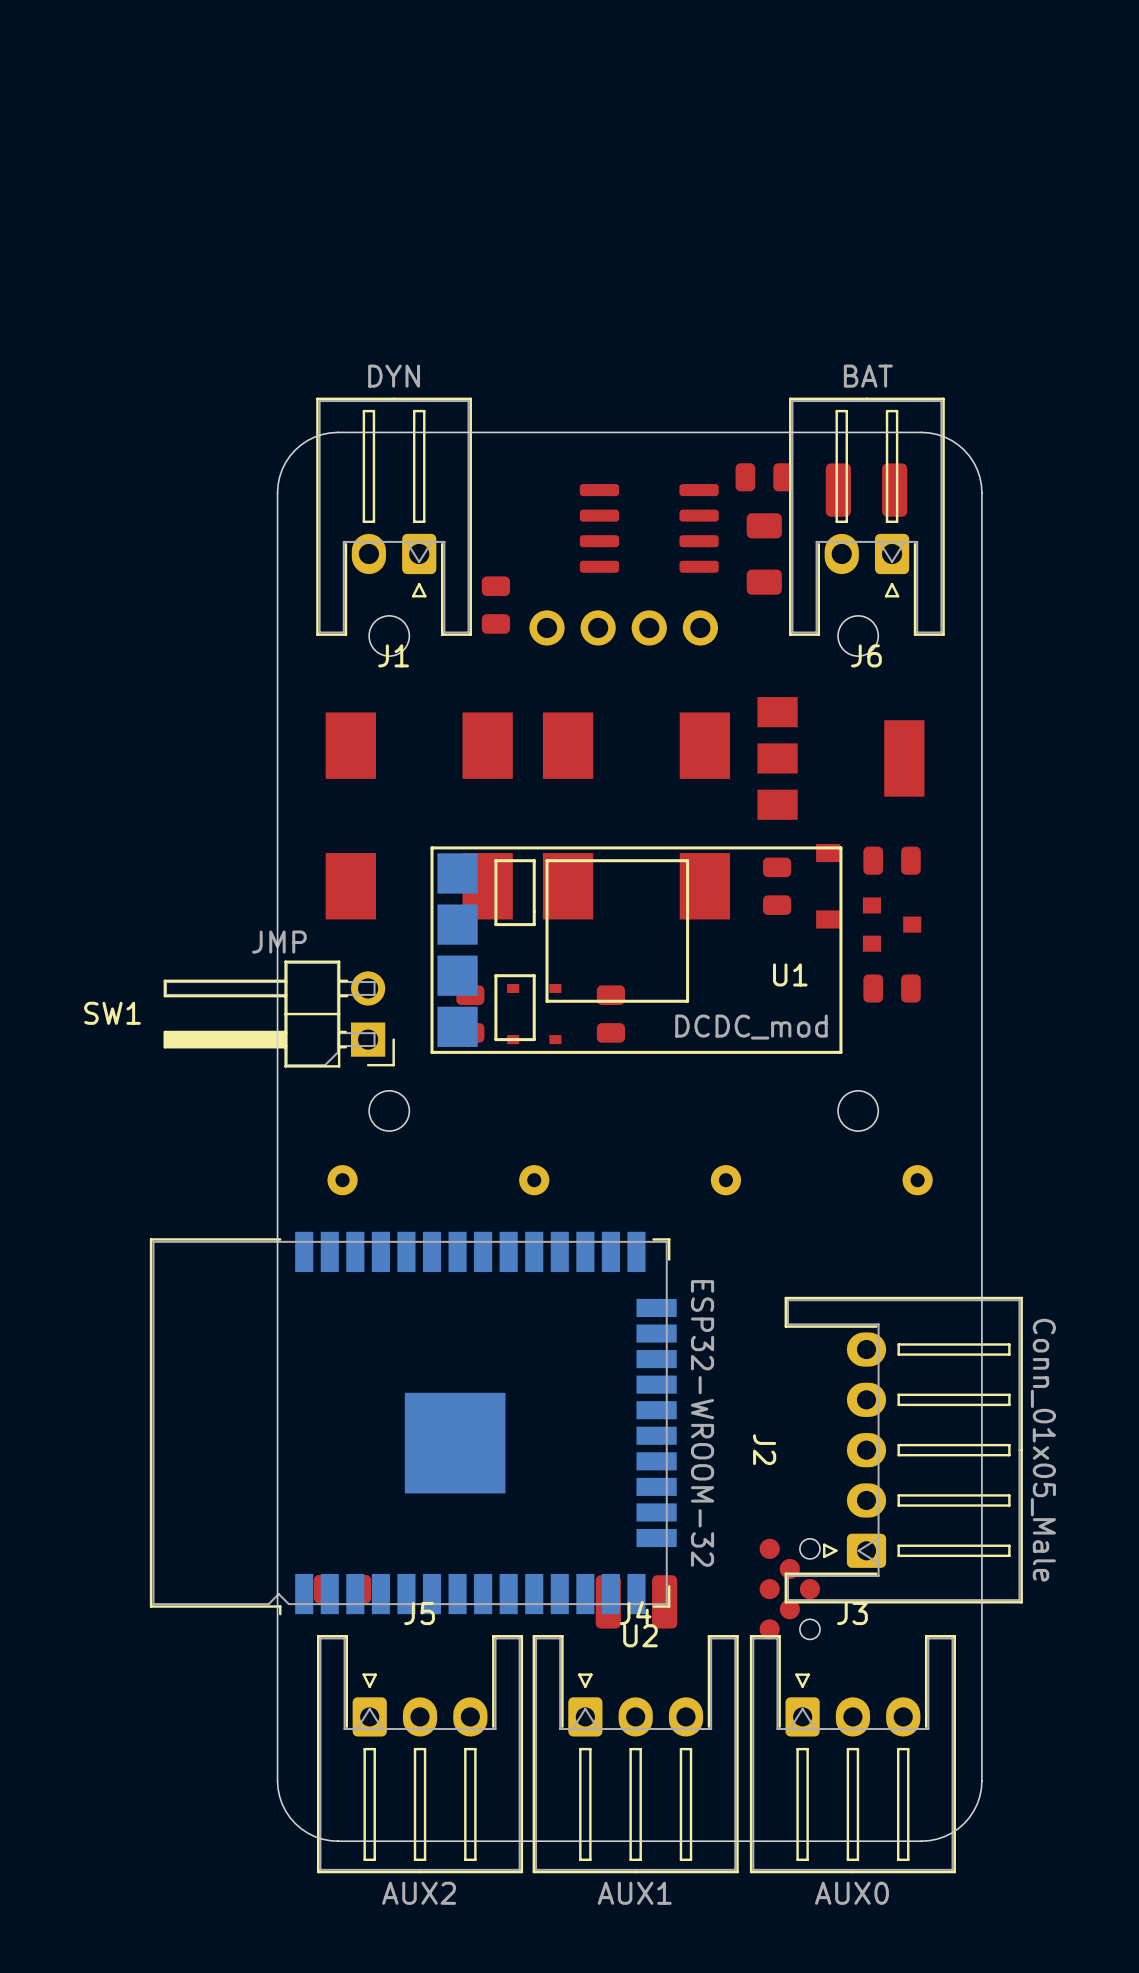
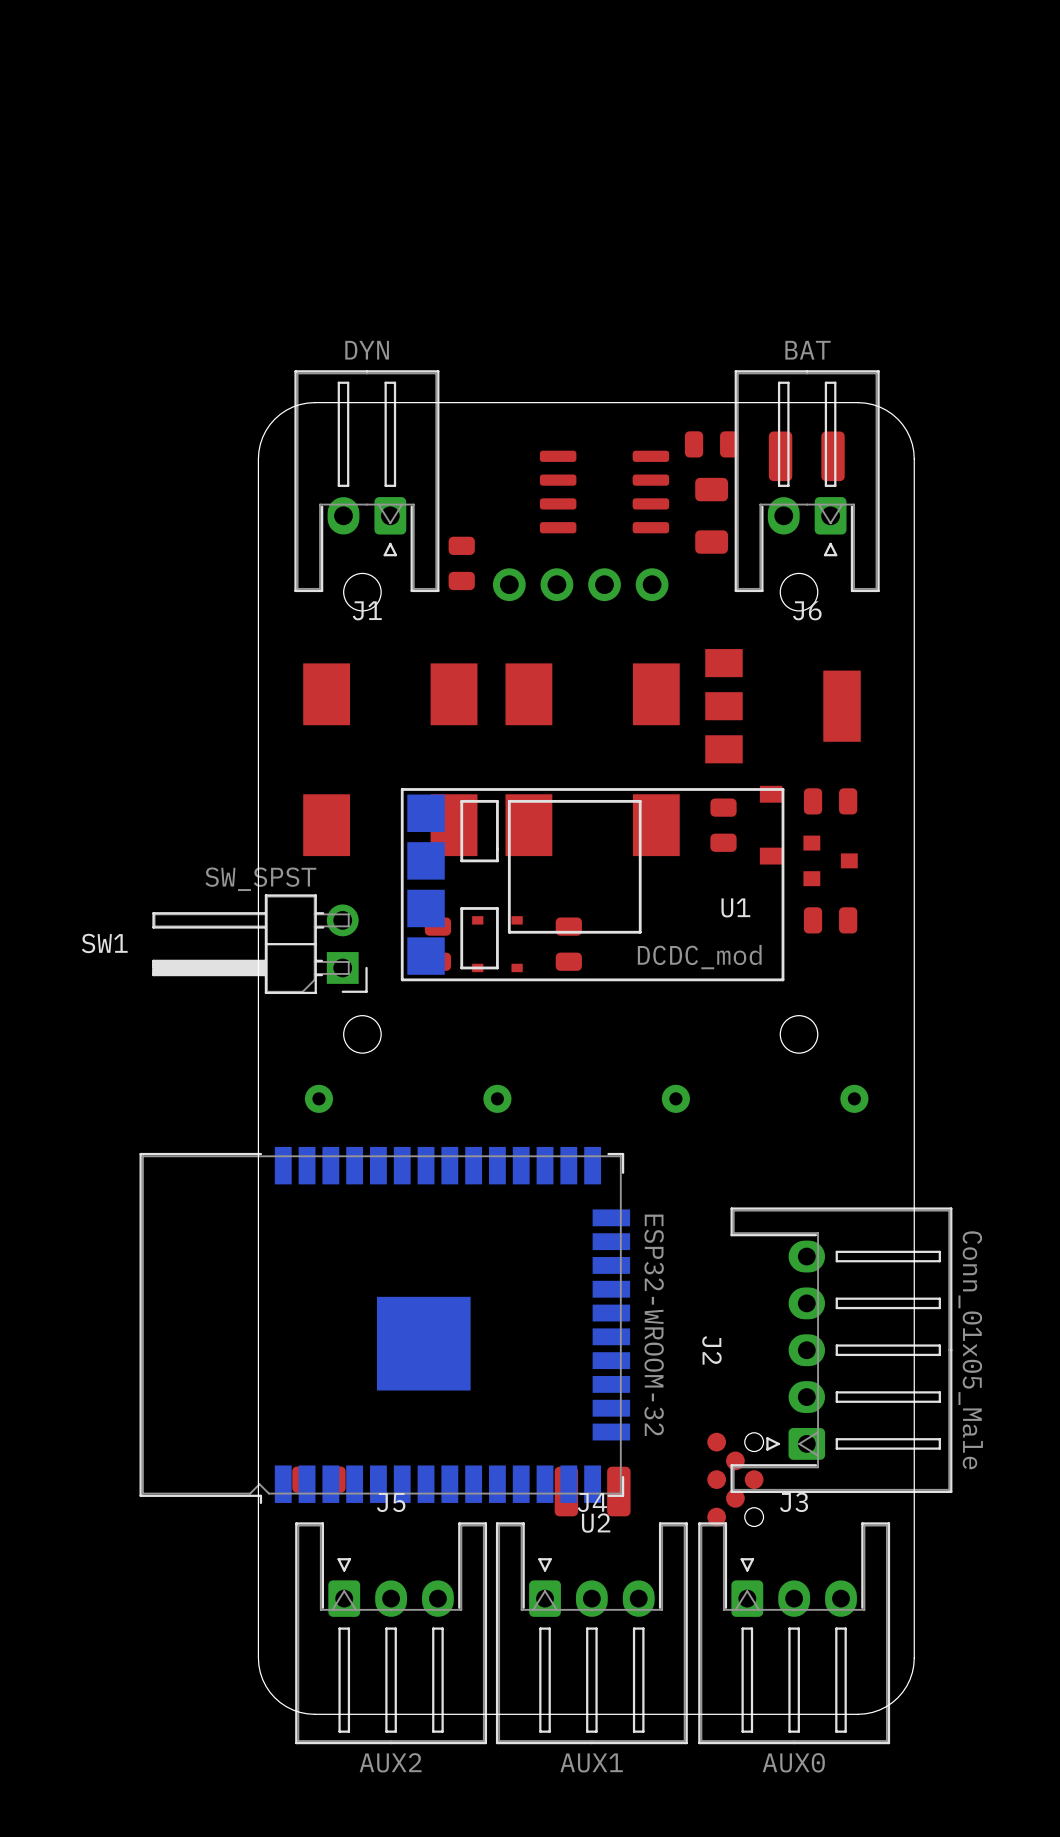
SW1 value: JMP (279, 942) -> SW_SPST (260, 879)

